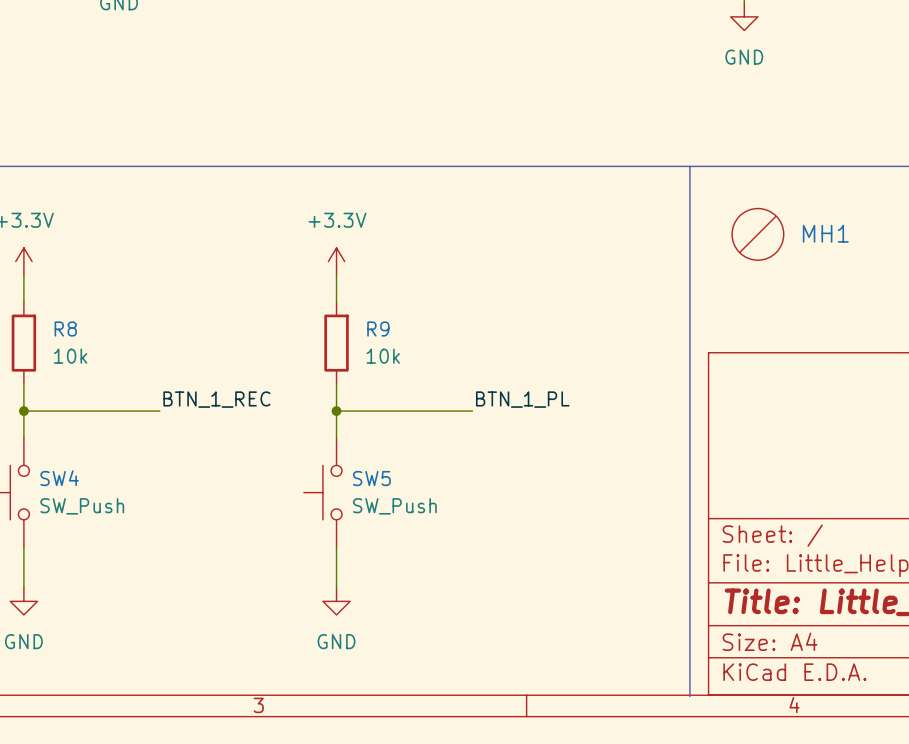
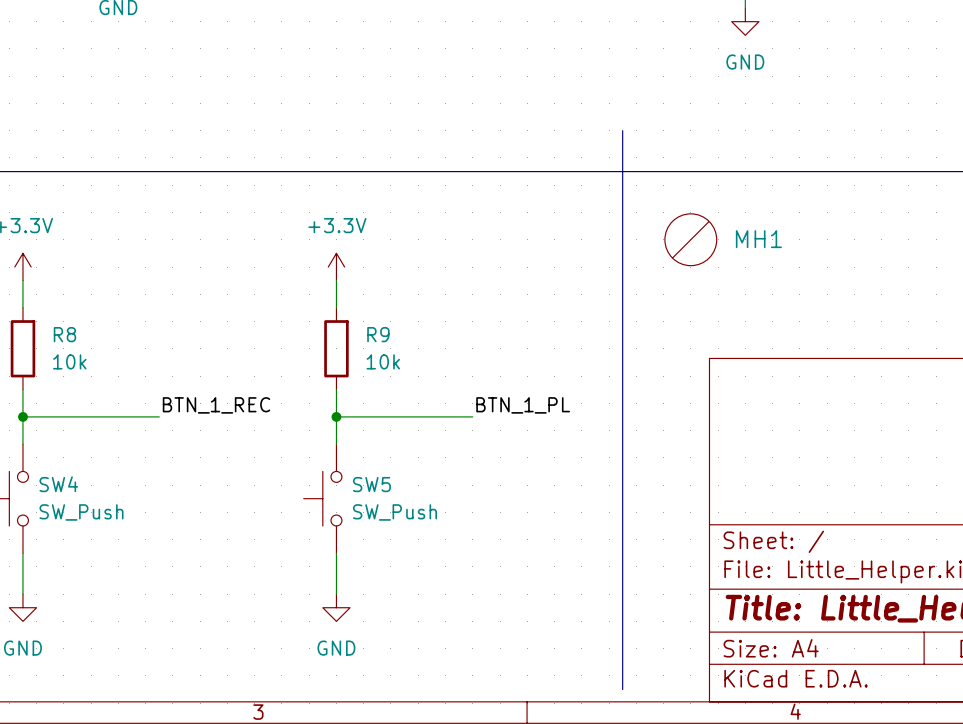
line: none -> (622, 130) (622, 689)
line: (689, 166) (689, 696) -> none
MH1 position: (757, 234) -> (690, 239)

